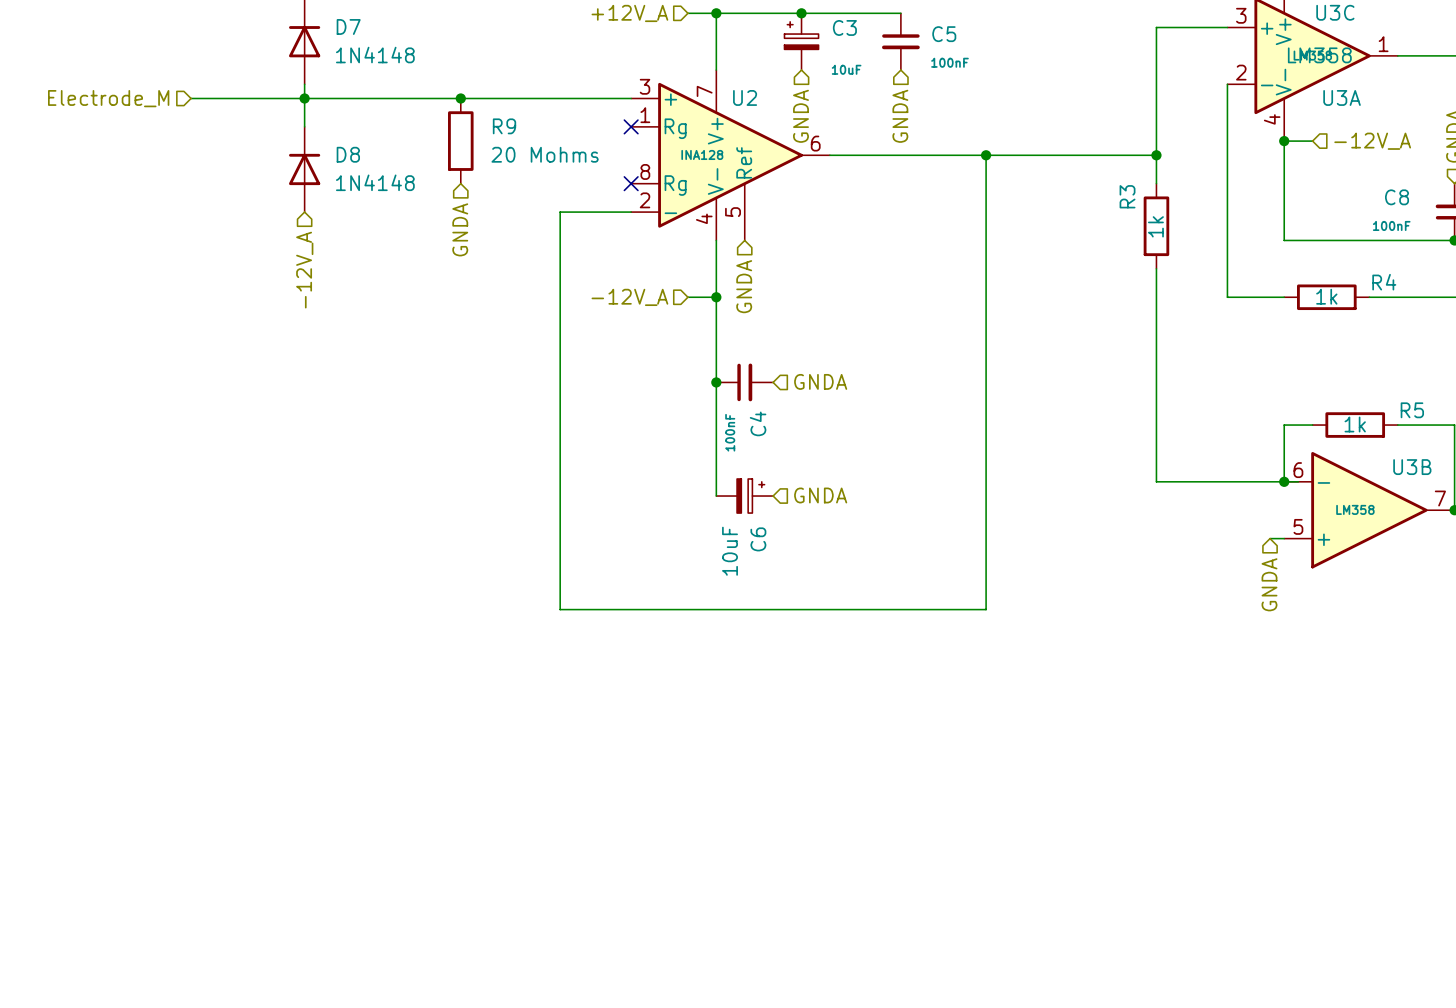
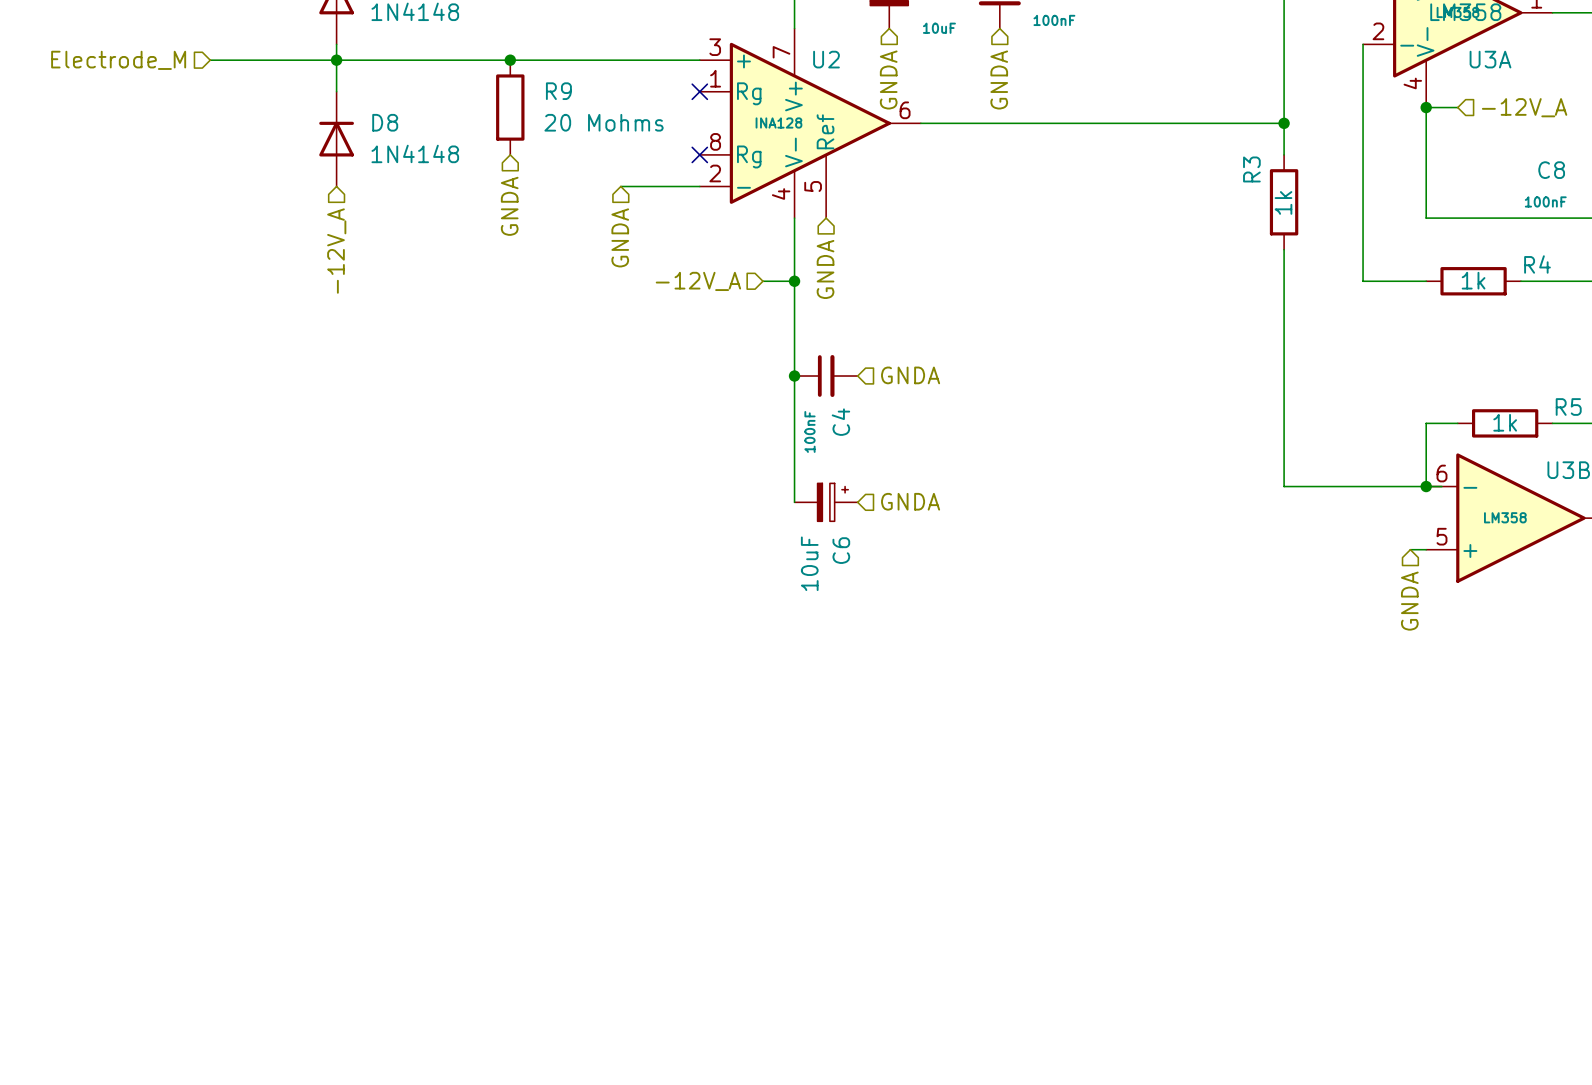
wire: (986, 155) (986, 609) (560, 609) (560, 212) -> none
junction: (986, 155) -> none
hierarchical label: none -> GNDA (620, 237)

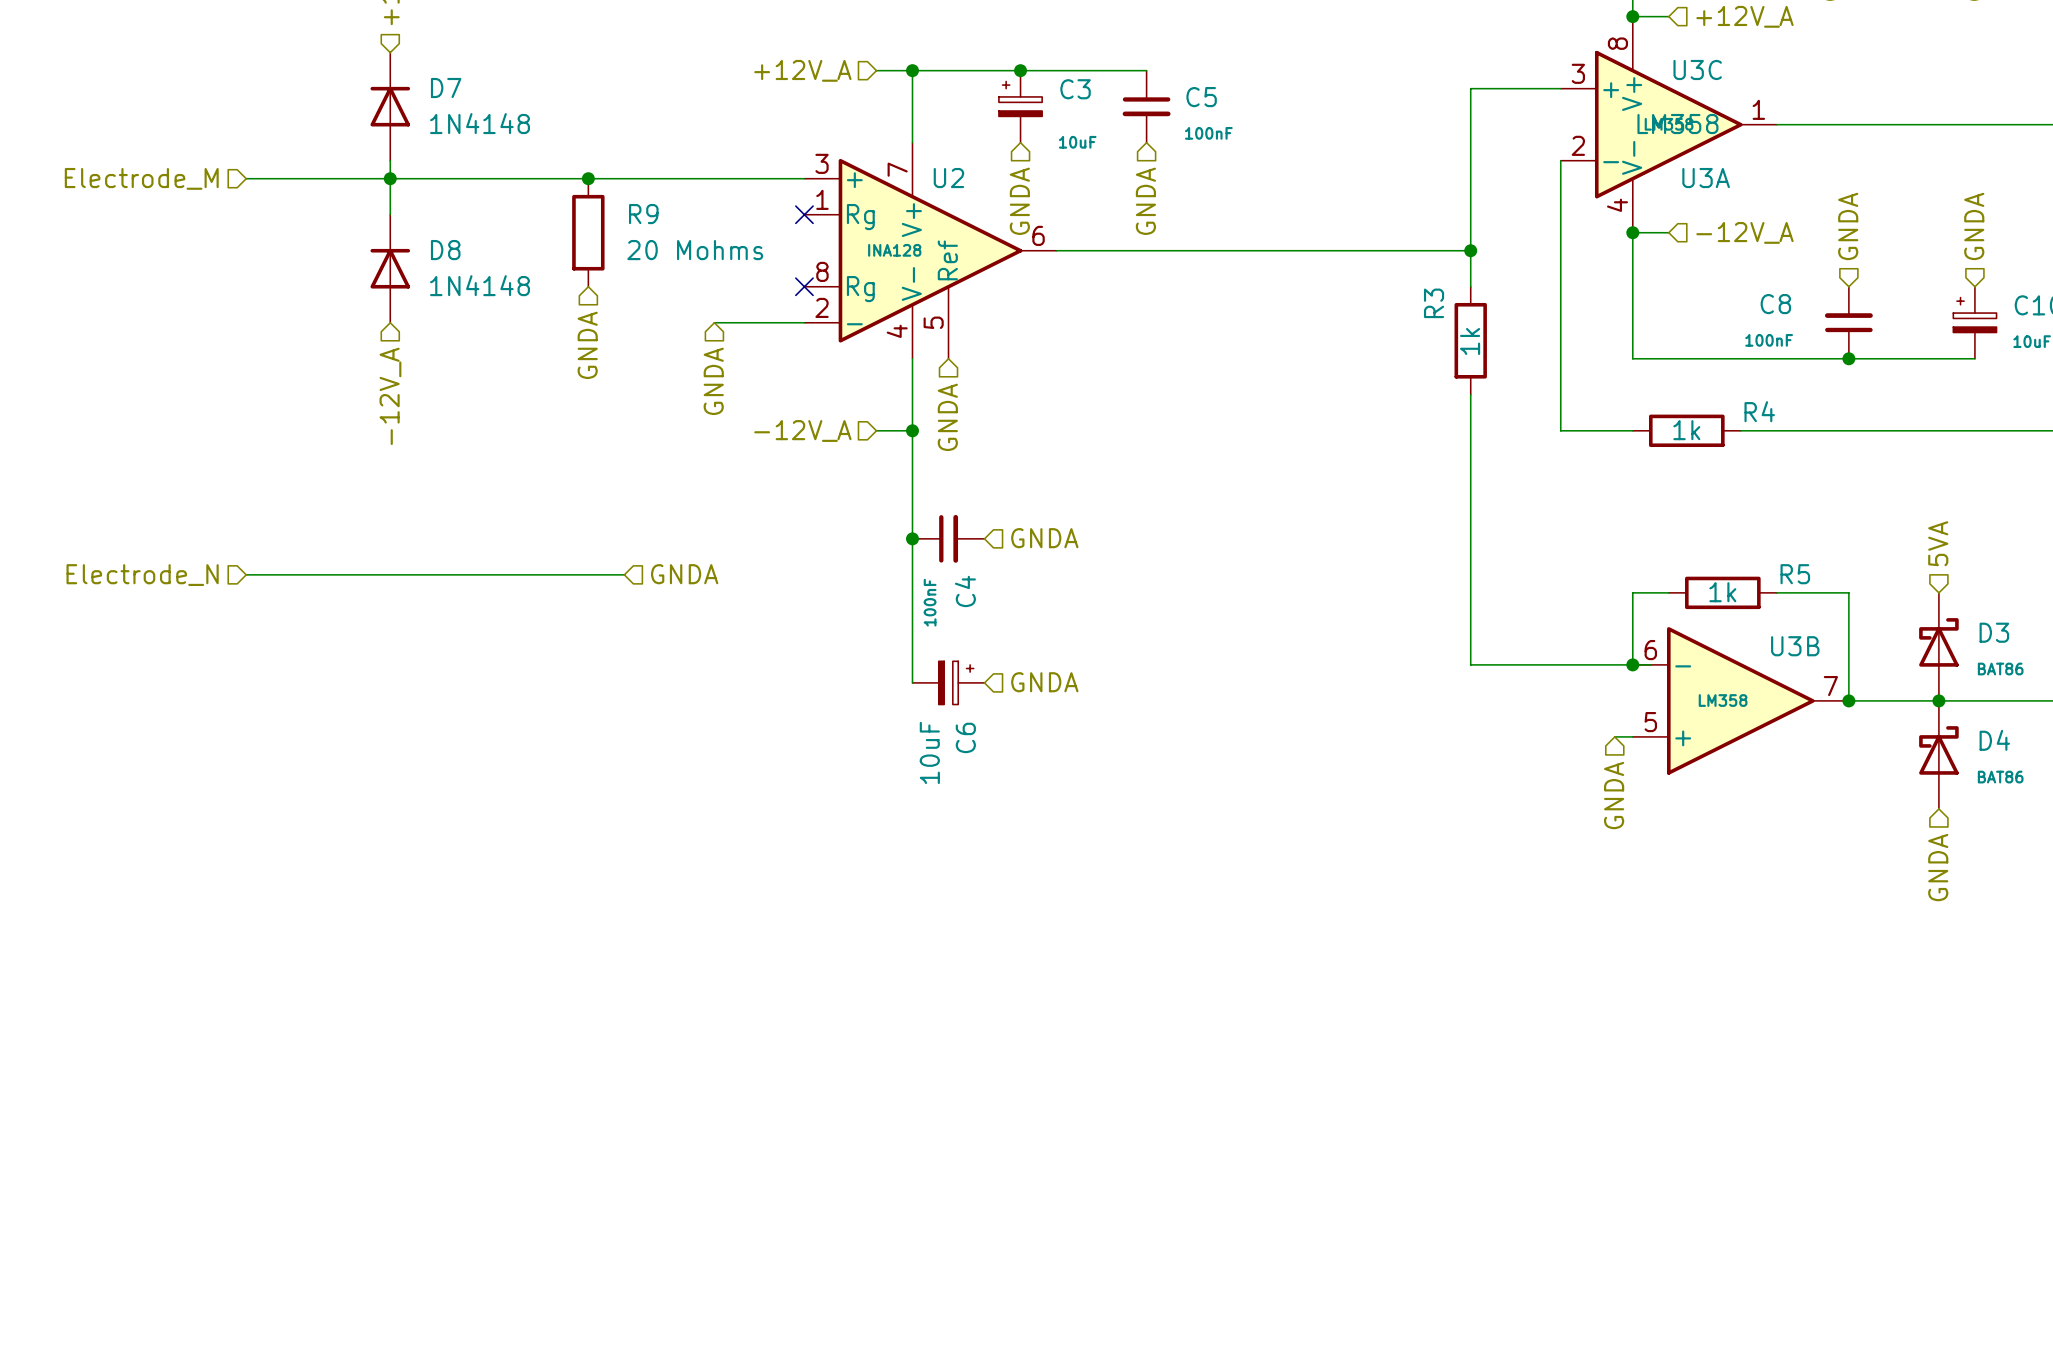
hierarchical label: none -> Electrode_N (142, 575)
wire: none -> (246, 574) (624, 574)
hierarchical label: none -> GNDA (684, 574)

